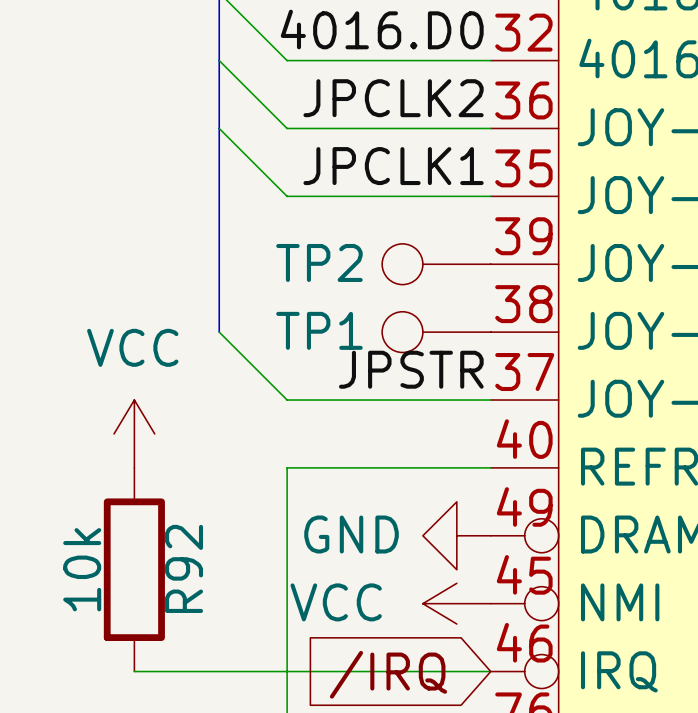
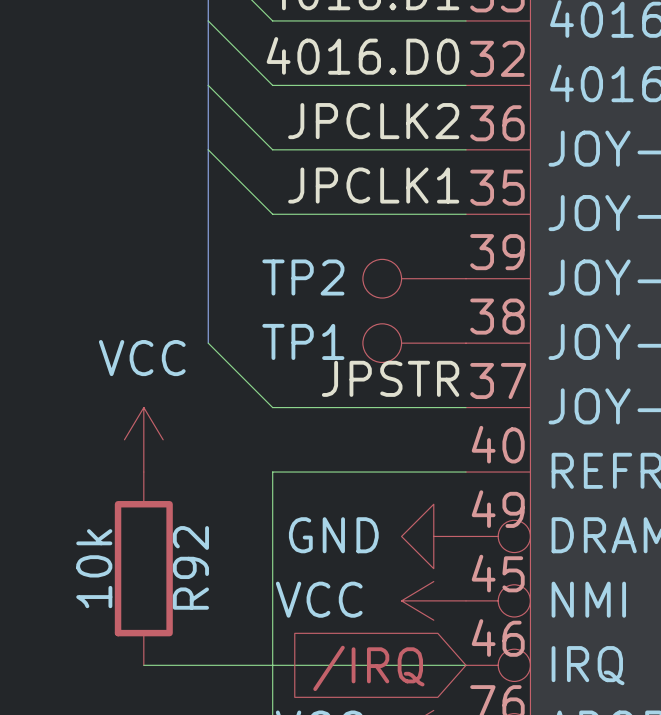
power symbol position: VCC (134, 433) -> VCC (143, 439)
R92 position: (134, 569) -> (143, 568)
wire: (134, 671) (151, 671) -> none

